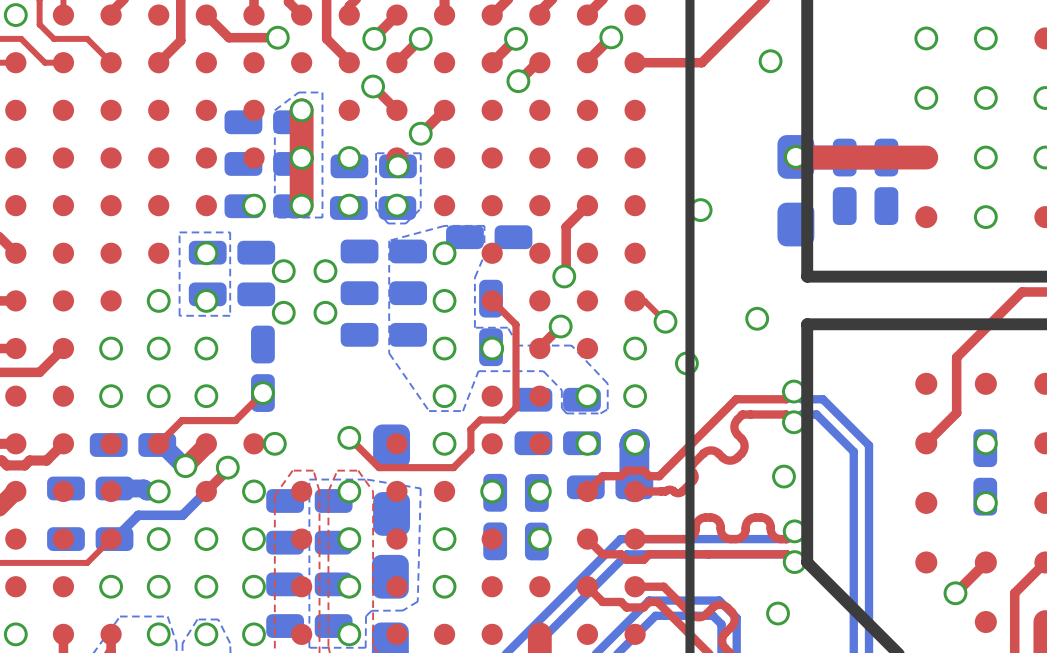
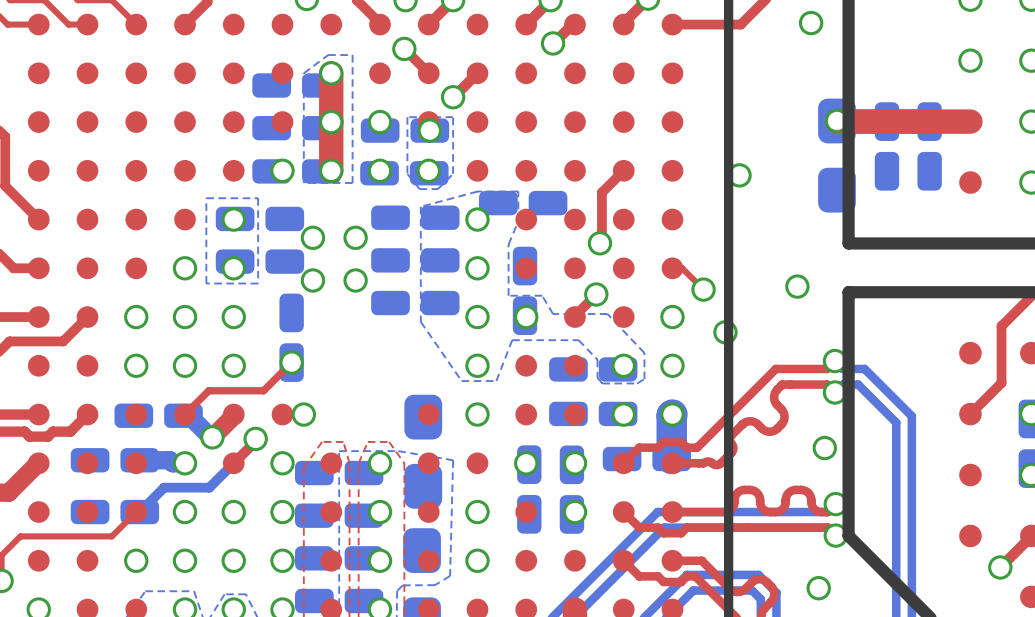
top track: (492, 300) (516, 324) (516, 408) (504, 420) (480, 420) (470, 429) (470, 450) (453, 467) (379, 467) (349, 437) -> none
via: (349, 437) -> none

